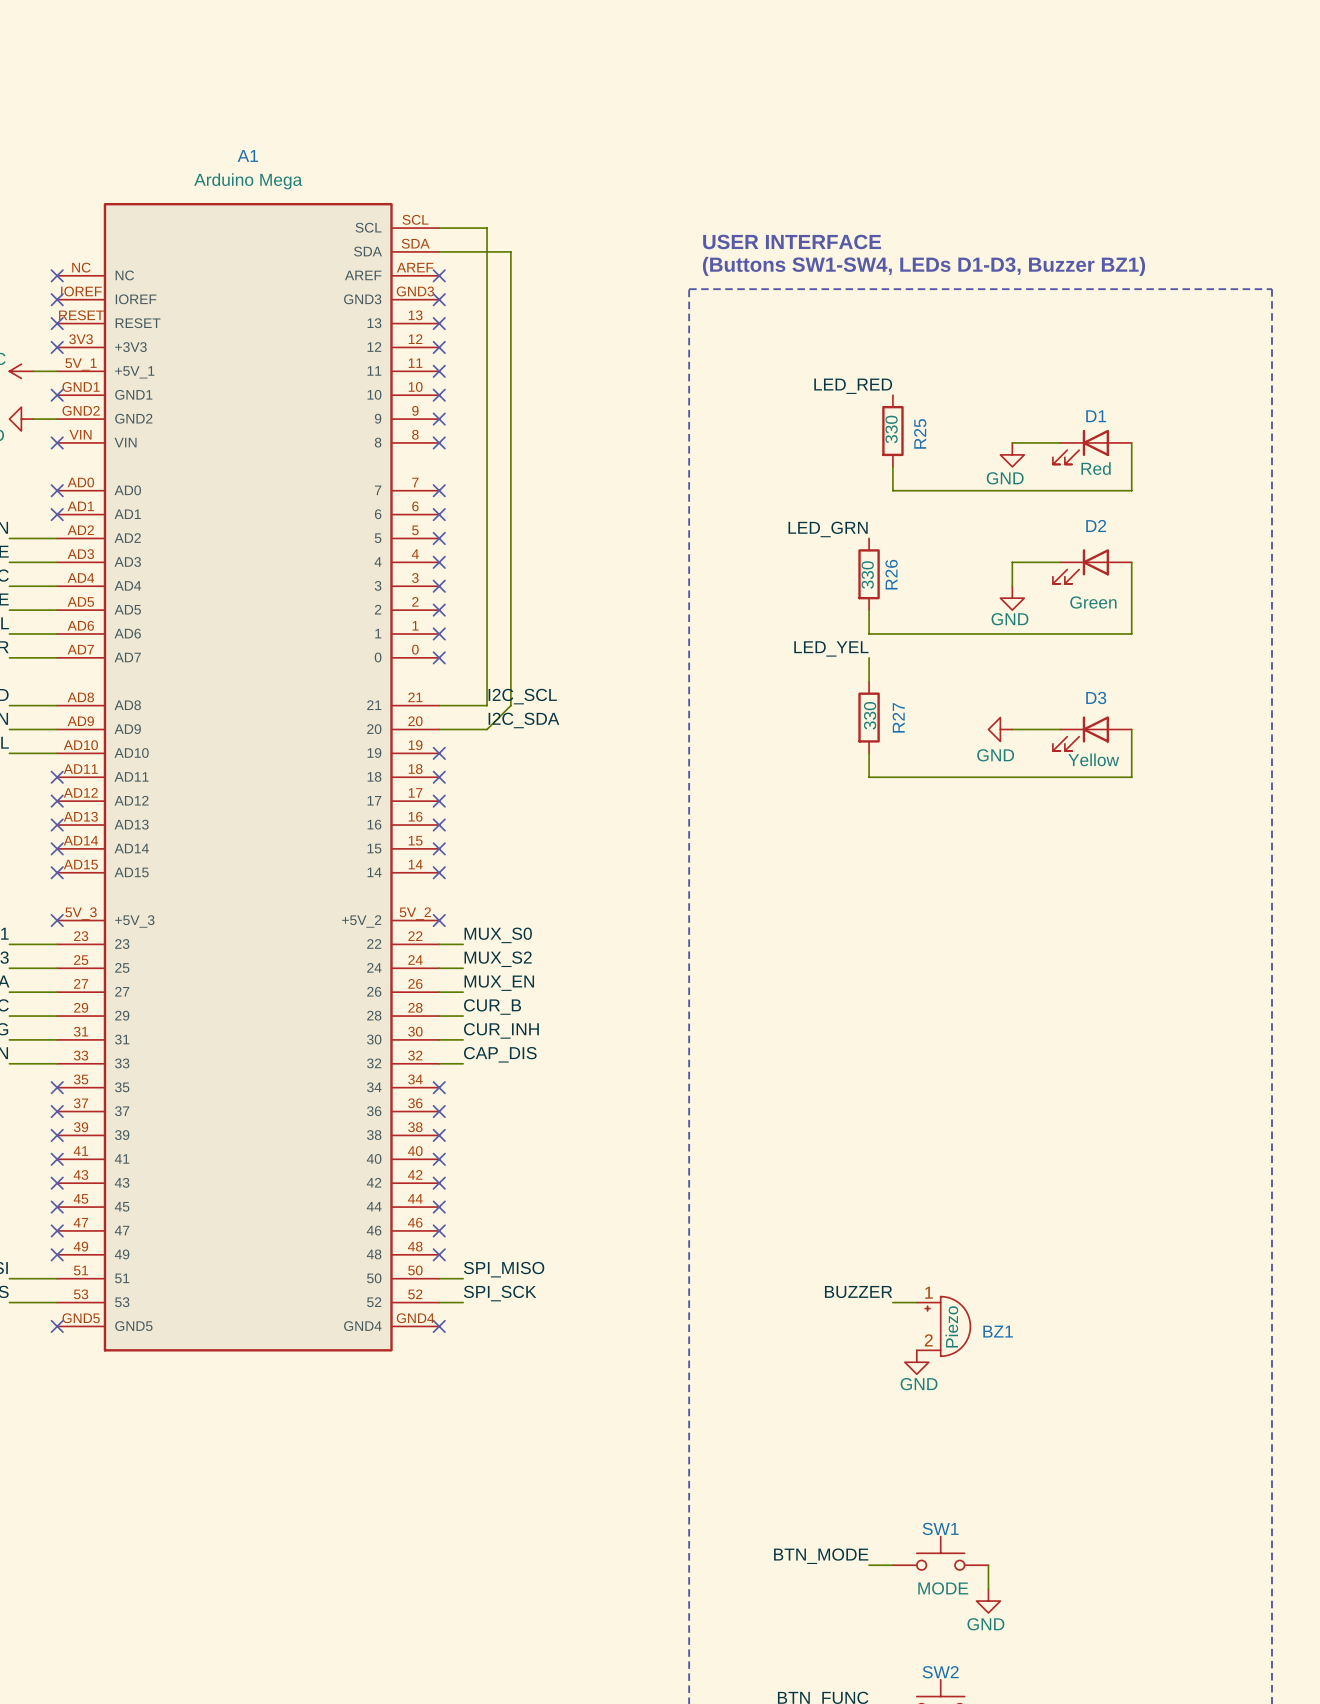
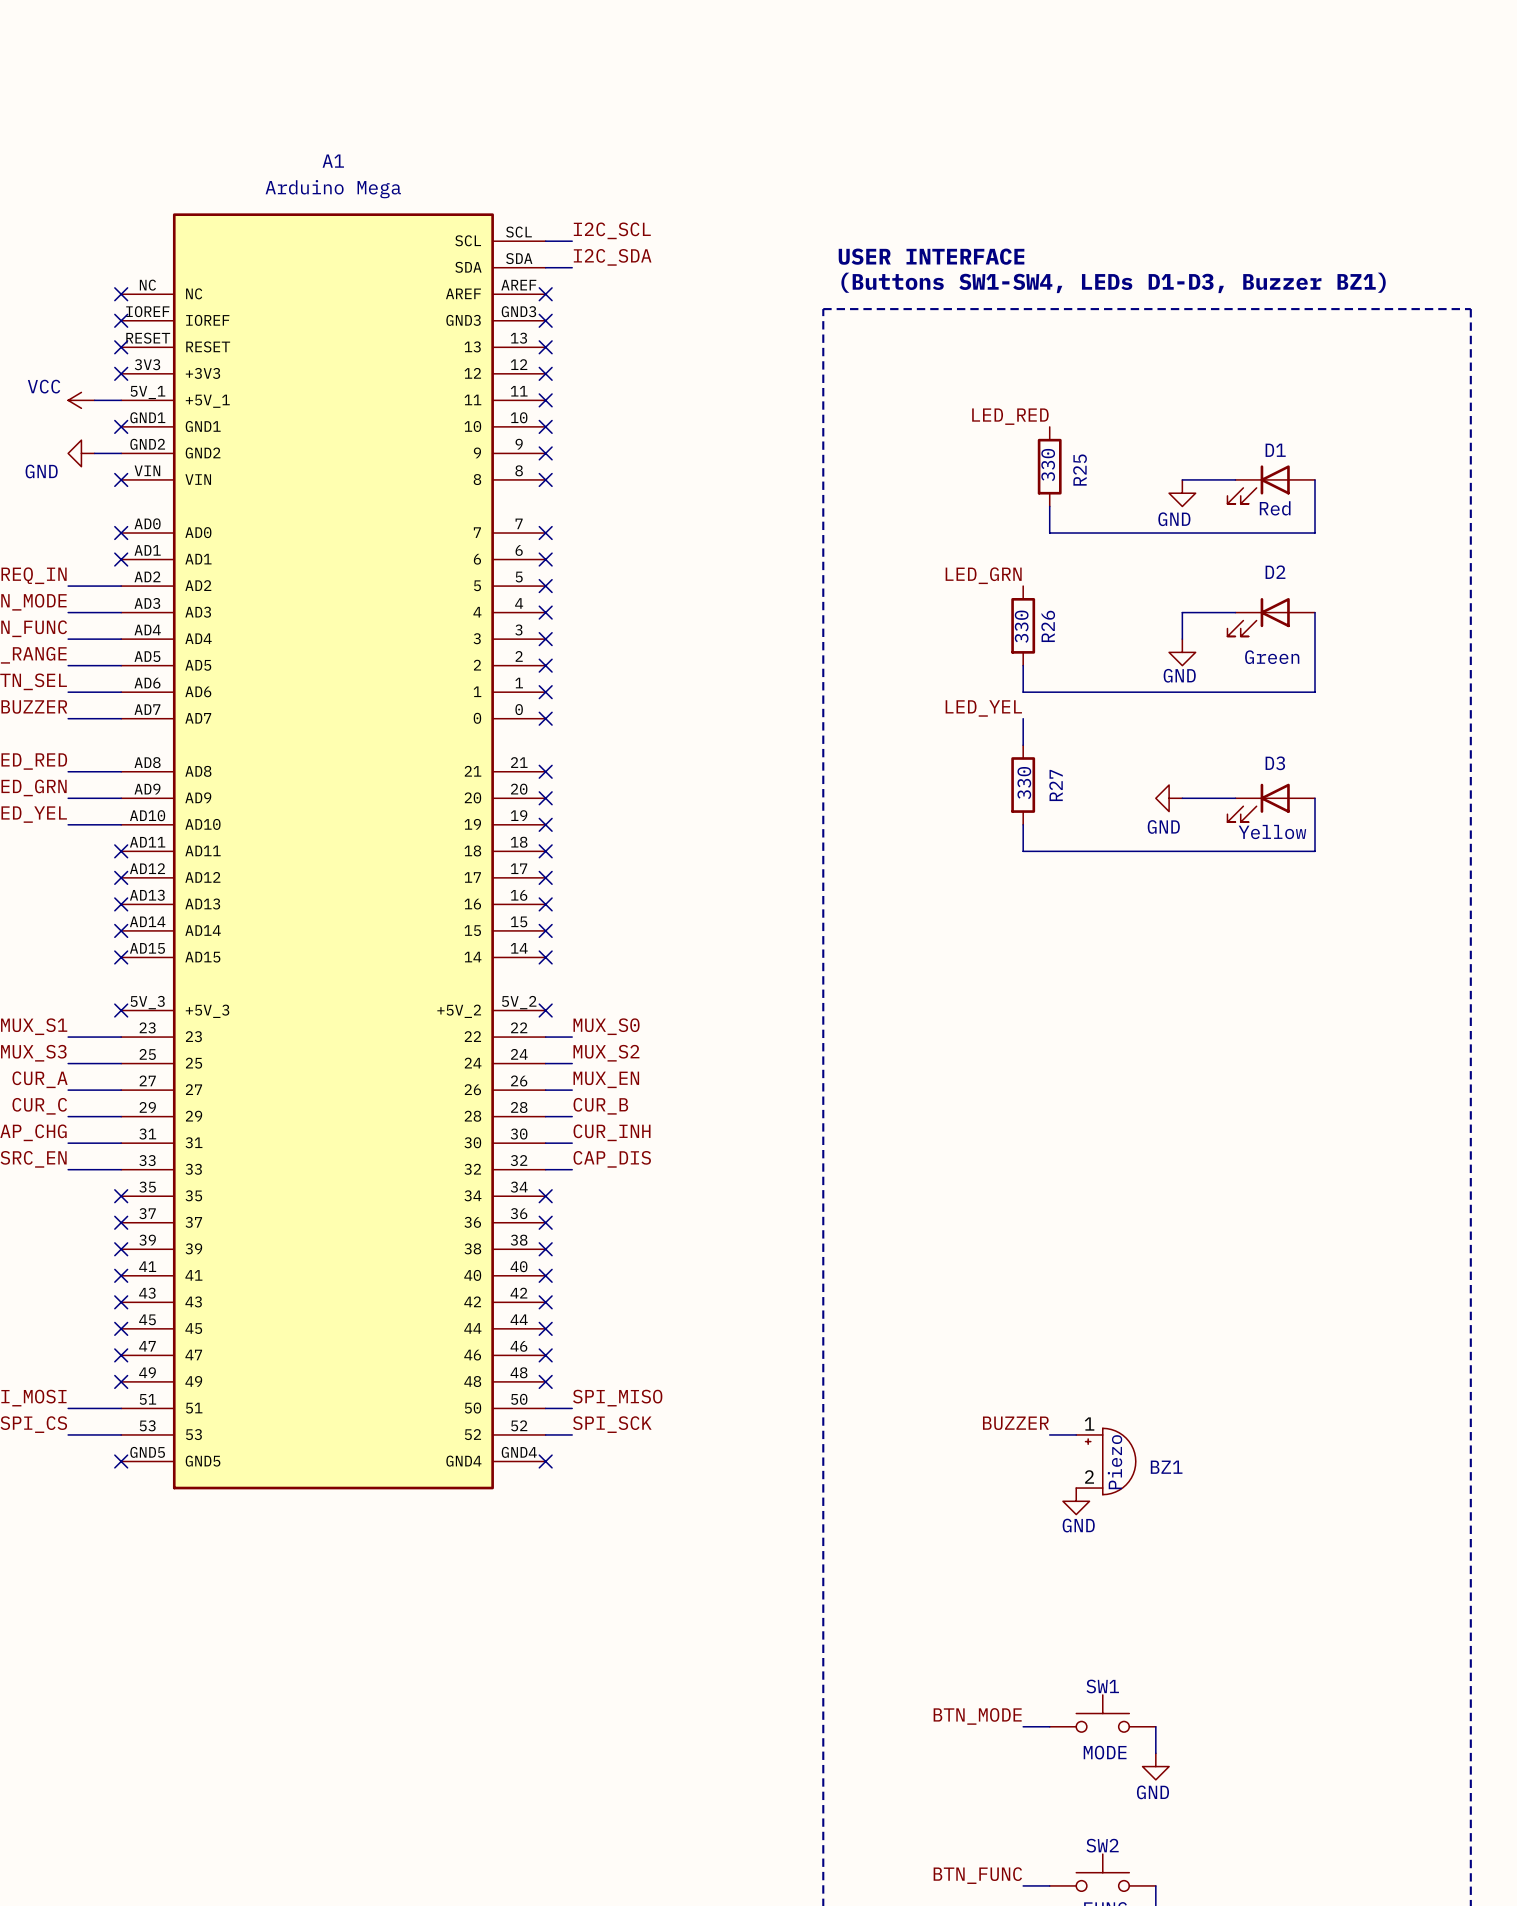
label: none -> I2C_SCL (612, 230)
wire: (463, 228) (487, 228) (487, 705) (439, 705) -> none
label: none -> I2C_SDA (612, 257)
wire: (463, 251) (510, 251) (510, 705) (487, 729) (439, 729) -> none
label: I2C_SCL (522, 696) -> none
no-connect mark: none -> (545, 771)
label: I2C_SDA (523, 720) -> none
no-connect mark: none -> (545, 798)

